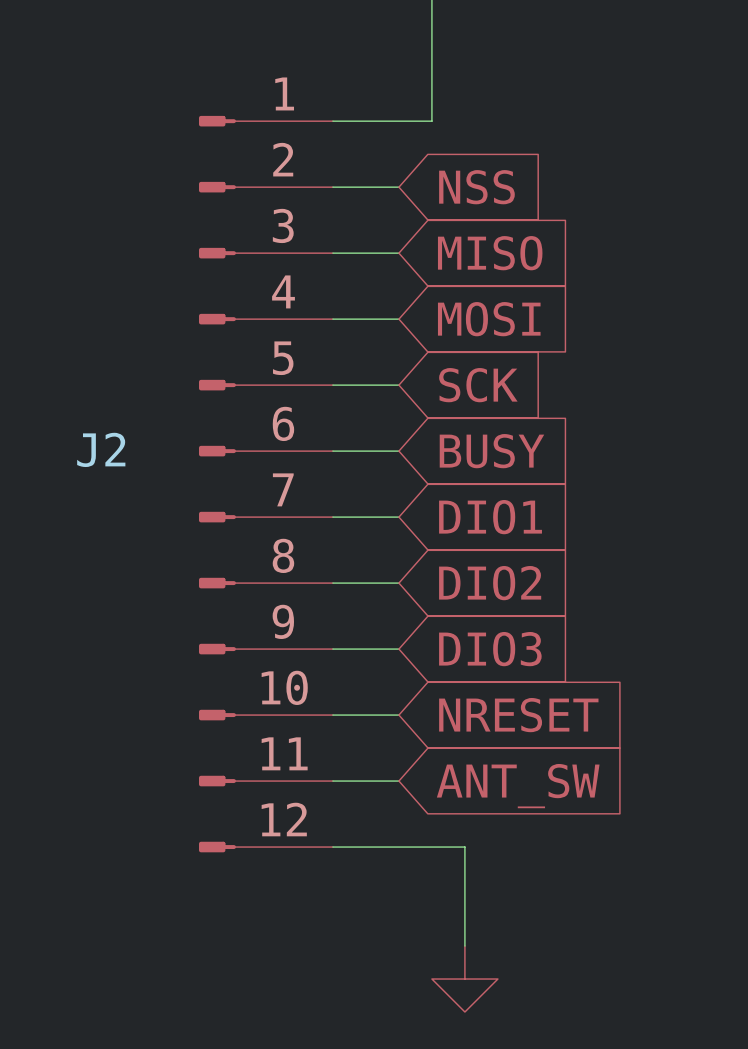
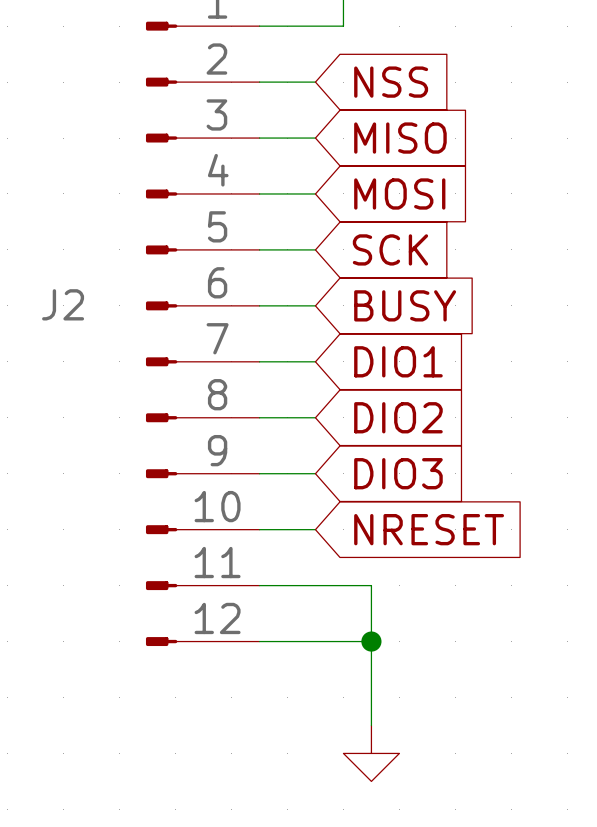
wire: none -> (315, 585) (371, 585) (371, 641)
global label: ANT_SW (518, 786) -> none
junction: none -> (371, 641)

